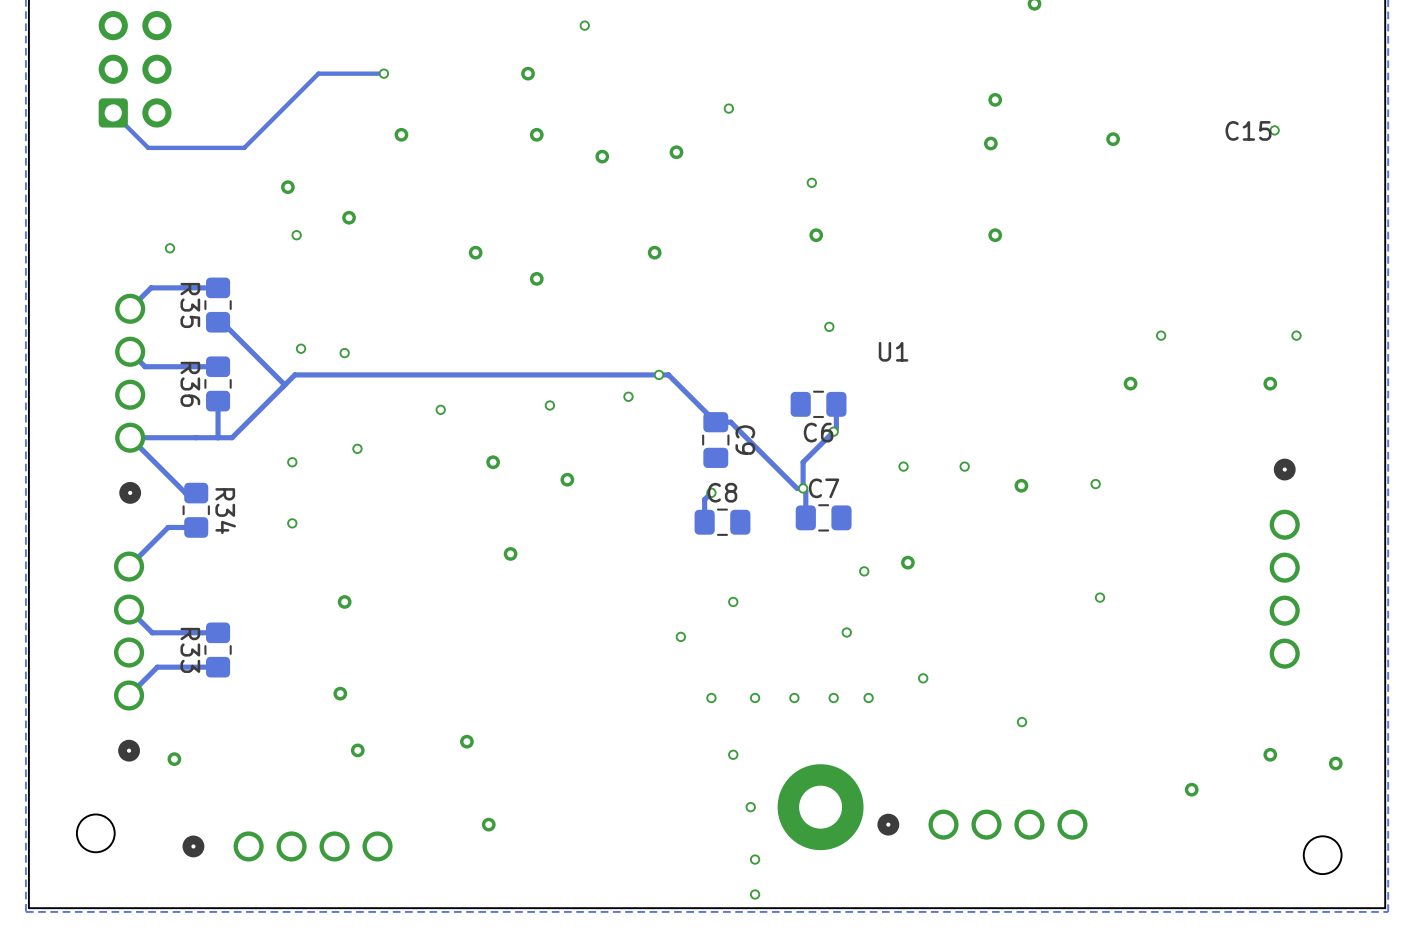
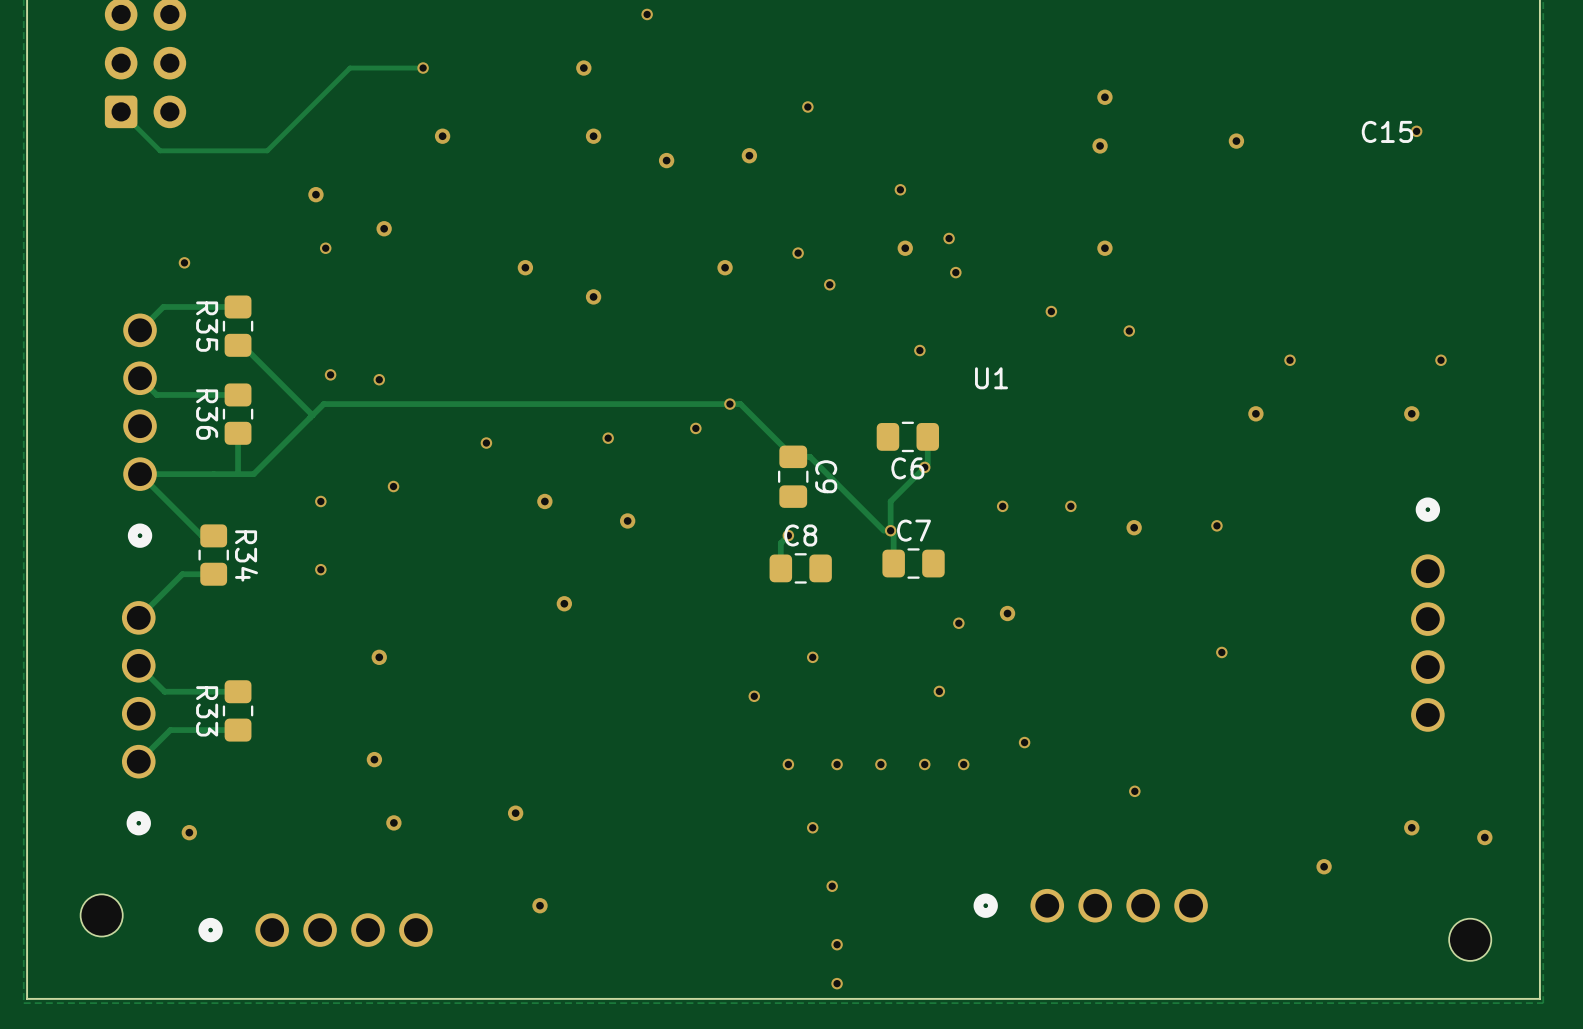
via: none -> (949, 238)
via: none -> (798, 253)
via: none -> (955, 272)
via: none -> (829, 284)
via: none -> (1051, 311)
via: none -> (1129, 331)
via: (820, 807) -> none

